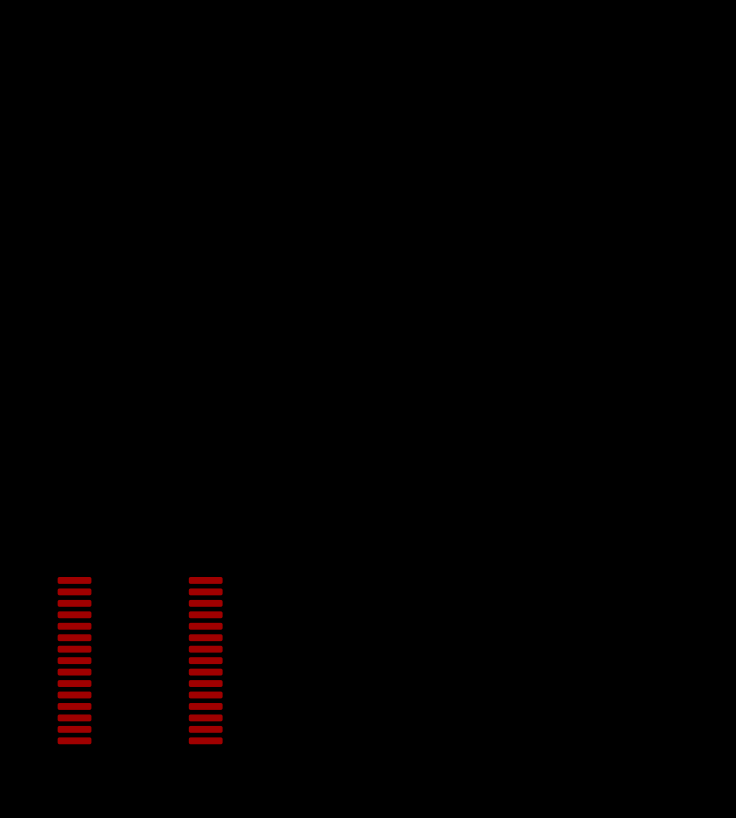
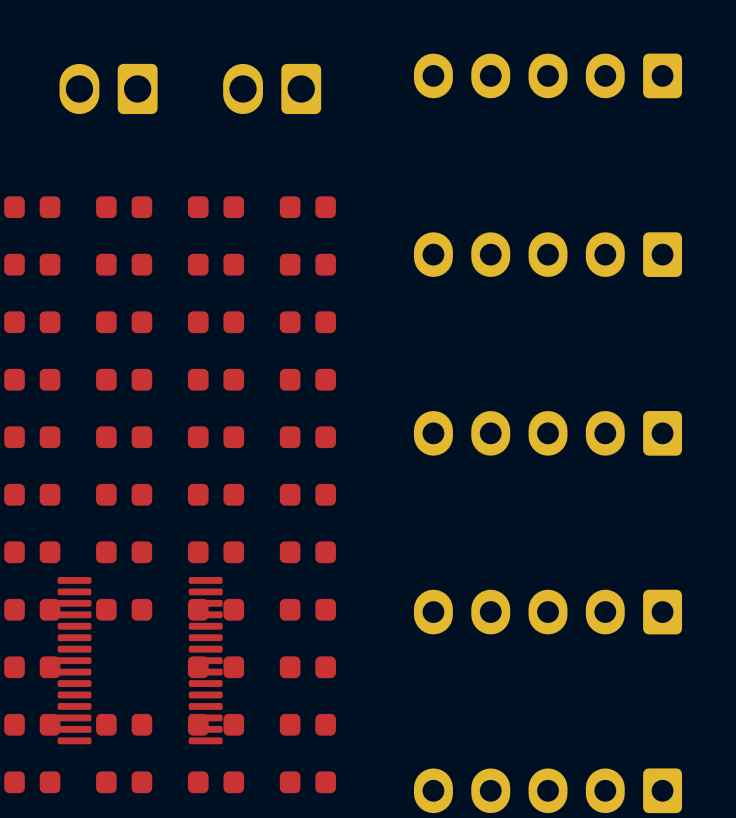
part: none -> (548, 75)
part: none -> (108, 88)
part: none -> (272, 88)
part: none -> (32, 207)
part: none -> (124, 207)
part: none -> (216, 207)
part: none -> (307, 207)
part: none -> (548, 254)
part: none -> (32, 264)
part: none -> (124, 264)
part: none -> (216, 264)
part: none -> (307, 264)
part: none -> (32, 322)
part: none -> (124, 322)
part: none -> (216, 322)
part: none -> (307, 322)
part: none -> (32, 379)
part: none -> (124, 379)
part: none -> (216, 379)
part: none -> (307, 379)
part: none -> (548, 433)
part: none -> (32, 437)
part: none -> (124, 437)
part: none -> (216, 437)
part: none -> (307, 437)
part: none -> (32, 494)
part: none -> (124, 494)
part: none -> (216, 494)
part: none -> (307, 494)
part: none -> (32, 552)
part: none -> (124, 552)
part: none -> (216, 552)
part: none -> (307, 552)
part: none -> (32, 609)
part: none -> (124, 609)
part: none -> (216, 609)
part: none -> (307, 609)
part: none -> (548, 612)
part: none -> (32, 667)
part: none -> (216, 667)
part: none -> (307, 667)
part: none -> (32, 724)
part: none -> (124, 724)
part: none -> (216, 724)
part: none -> (307, 724)
part: none -> (32, 782)
part: none -> (124, 782)
part: none -> (216, 782)
part: none -> (307, 782)
part: none -> (548, 790)

